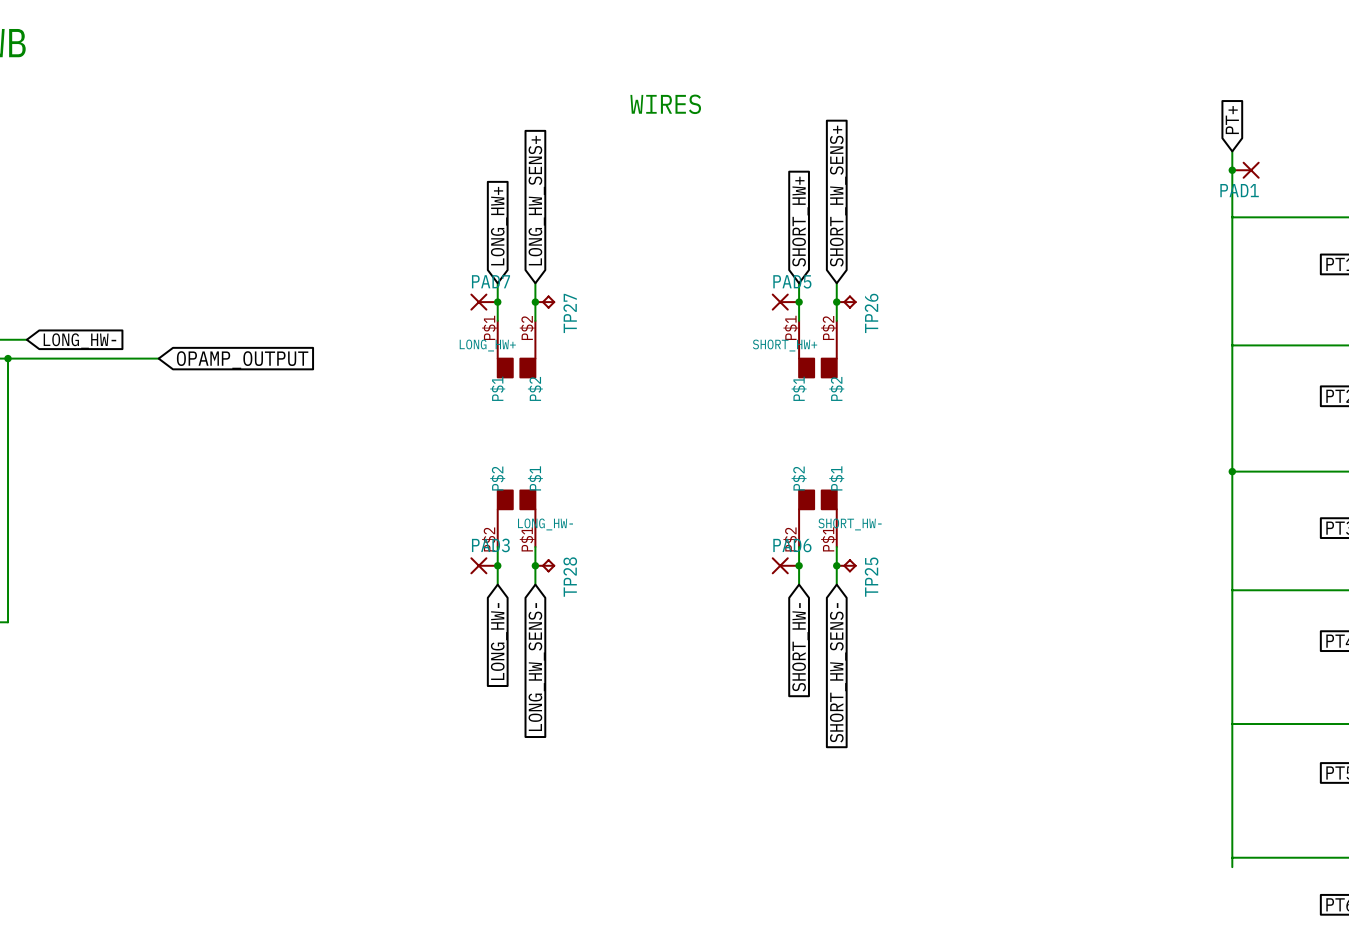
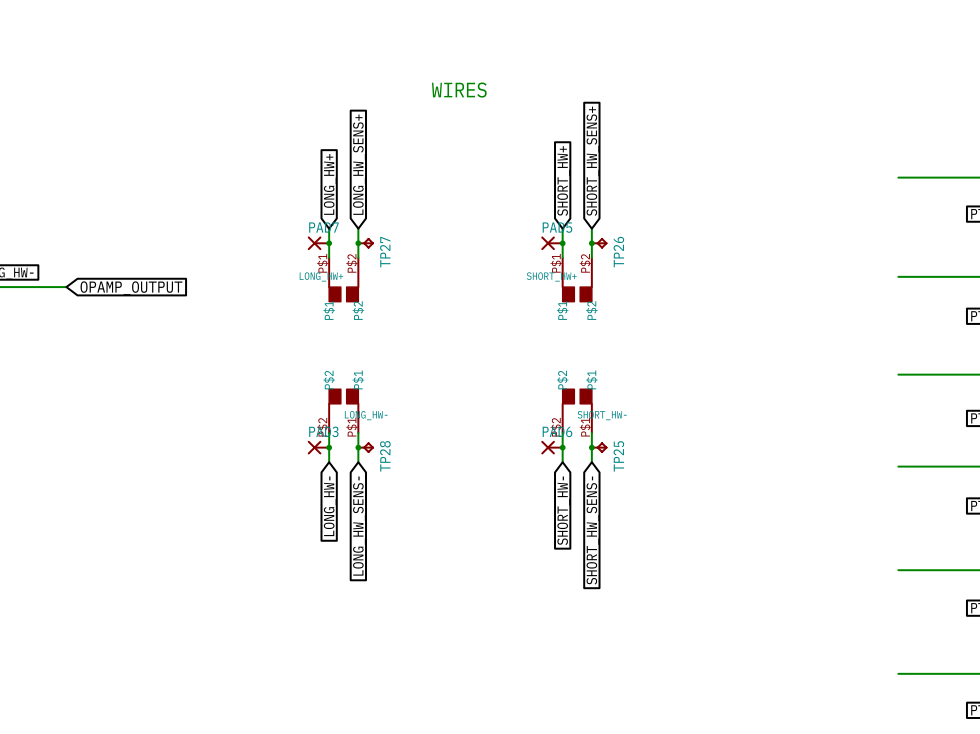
global label: PT+ (1232, 120) -> none
wire: (1232, 151) (1232, 867) -> none
junction: (1232, 170) -> none
PAD1: (1245, 170) -> none
junction: (1232, 471) -> none

